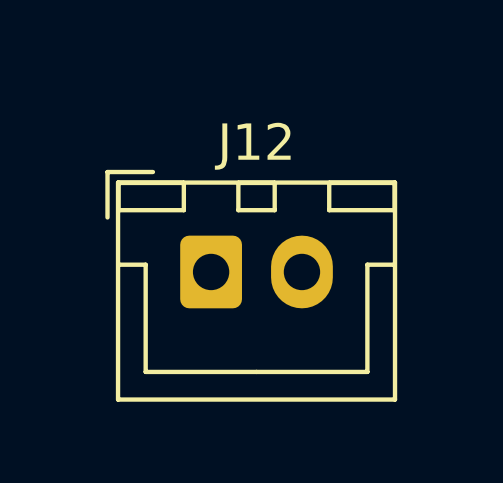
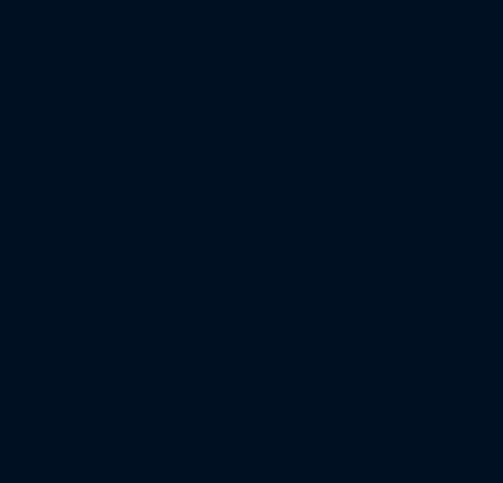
J12: (251, 285) -> none

